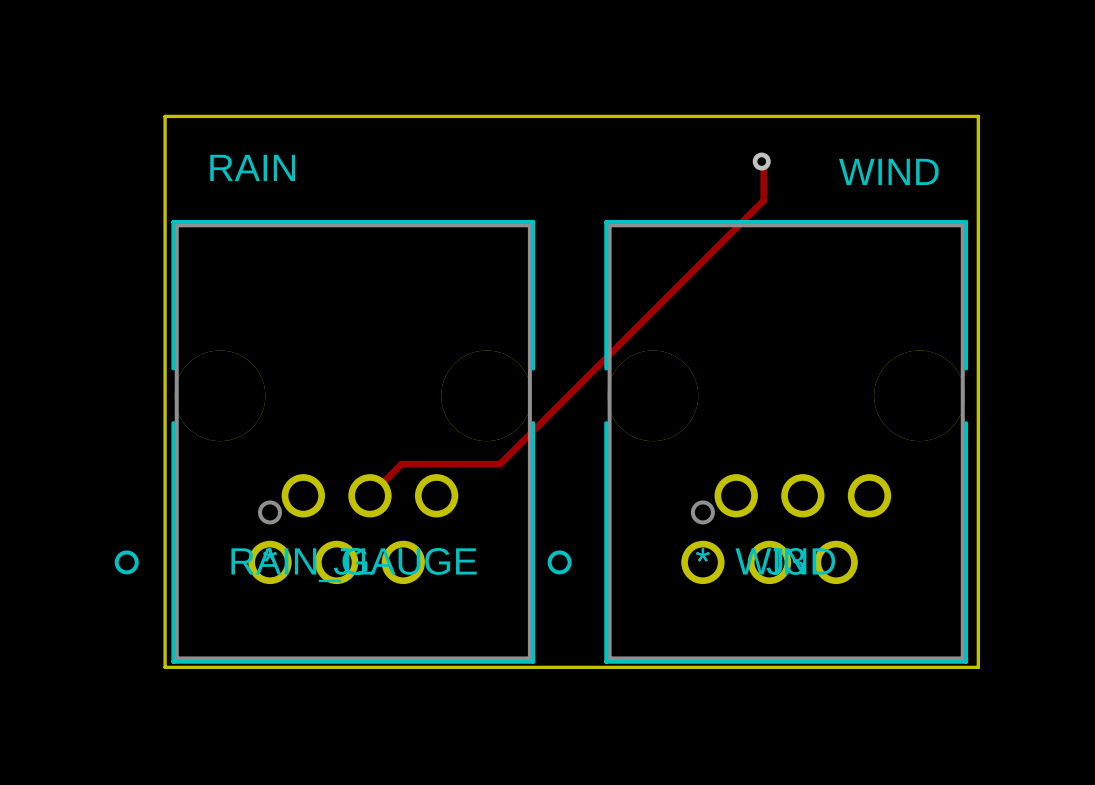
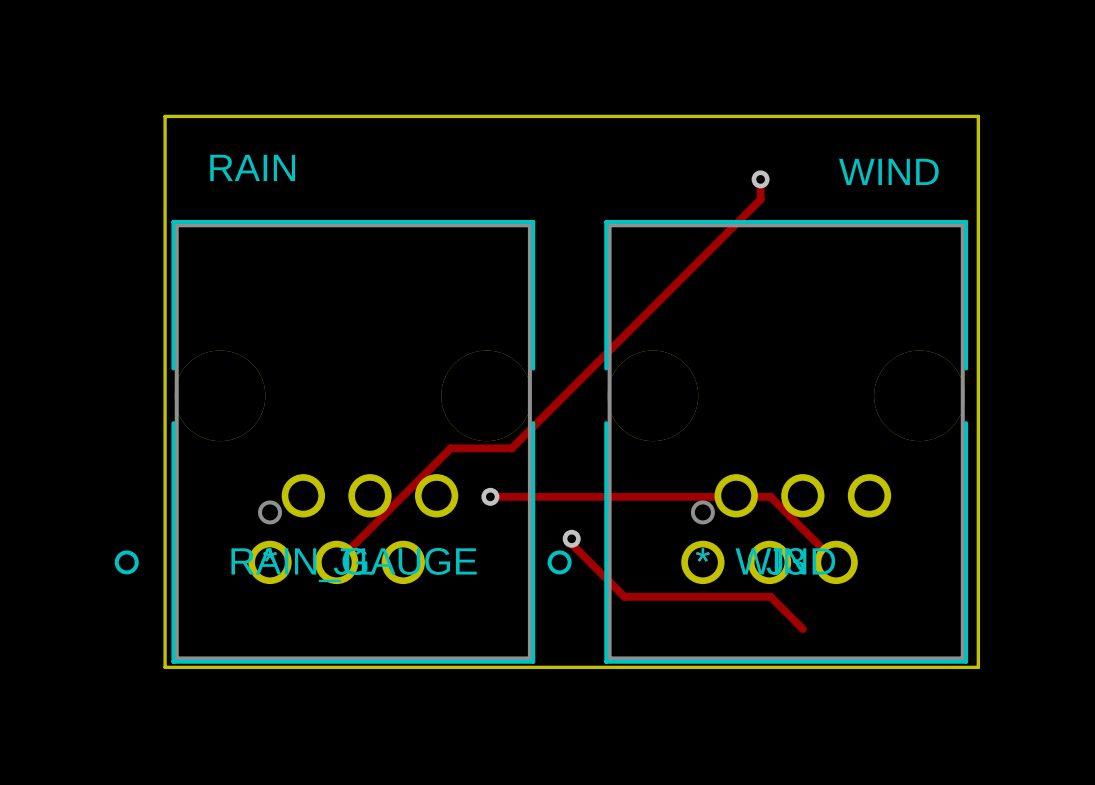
track: (761, 161) (763, 163) (763, 200) (500, 464) (401, 464) (369, 495) -> none
via position: (761, 161) -> (760, 179)
track: none -> (760, 179) (760, 199) (511, 448) (450, 448) (336, 562)
track: none -> (490, 496) (770, 496) (836, 562)
via: none -> (490, 496)
track: none -> (571, 538) (571, 544) (624, 596) (770, 596) (802, 629)
via: none -> (571, 538)

